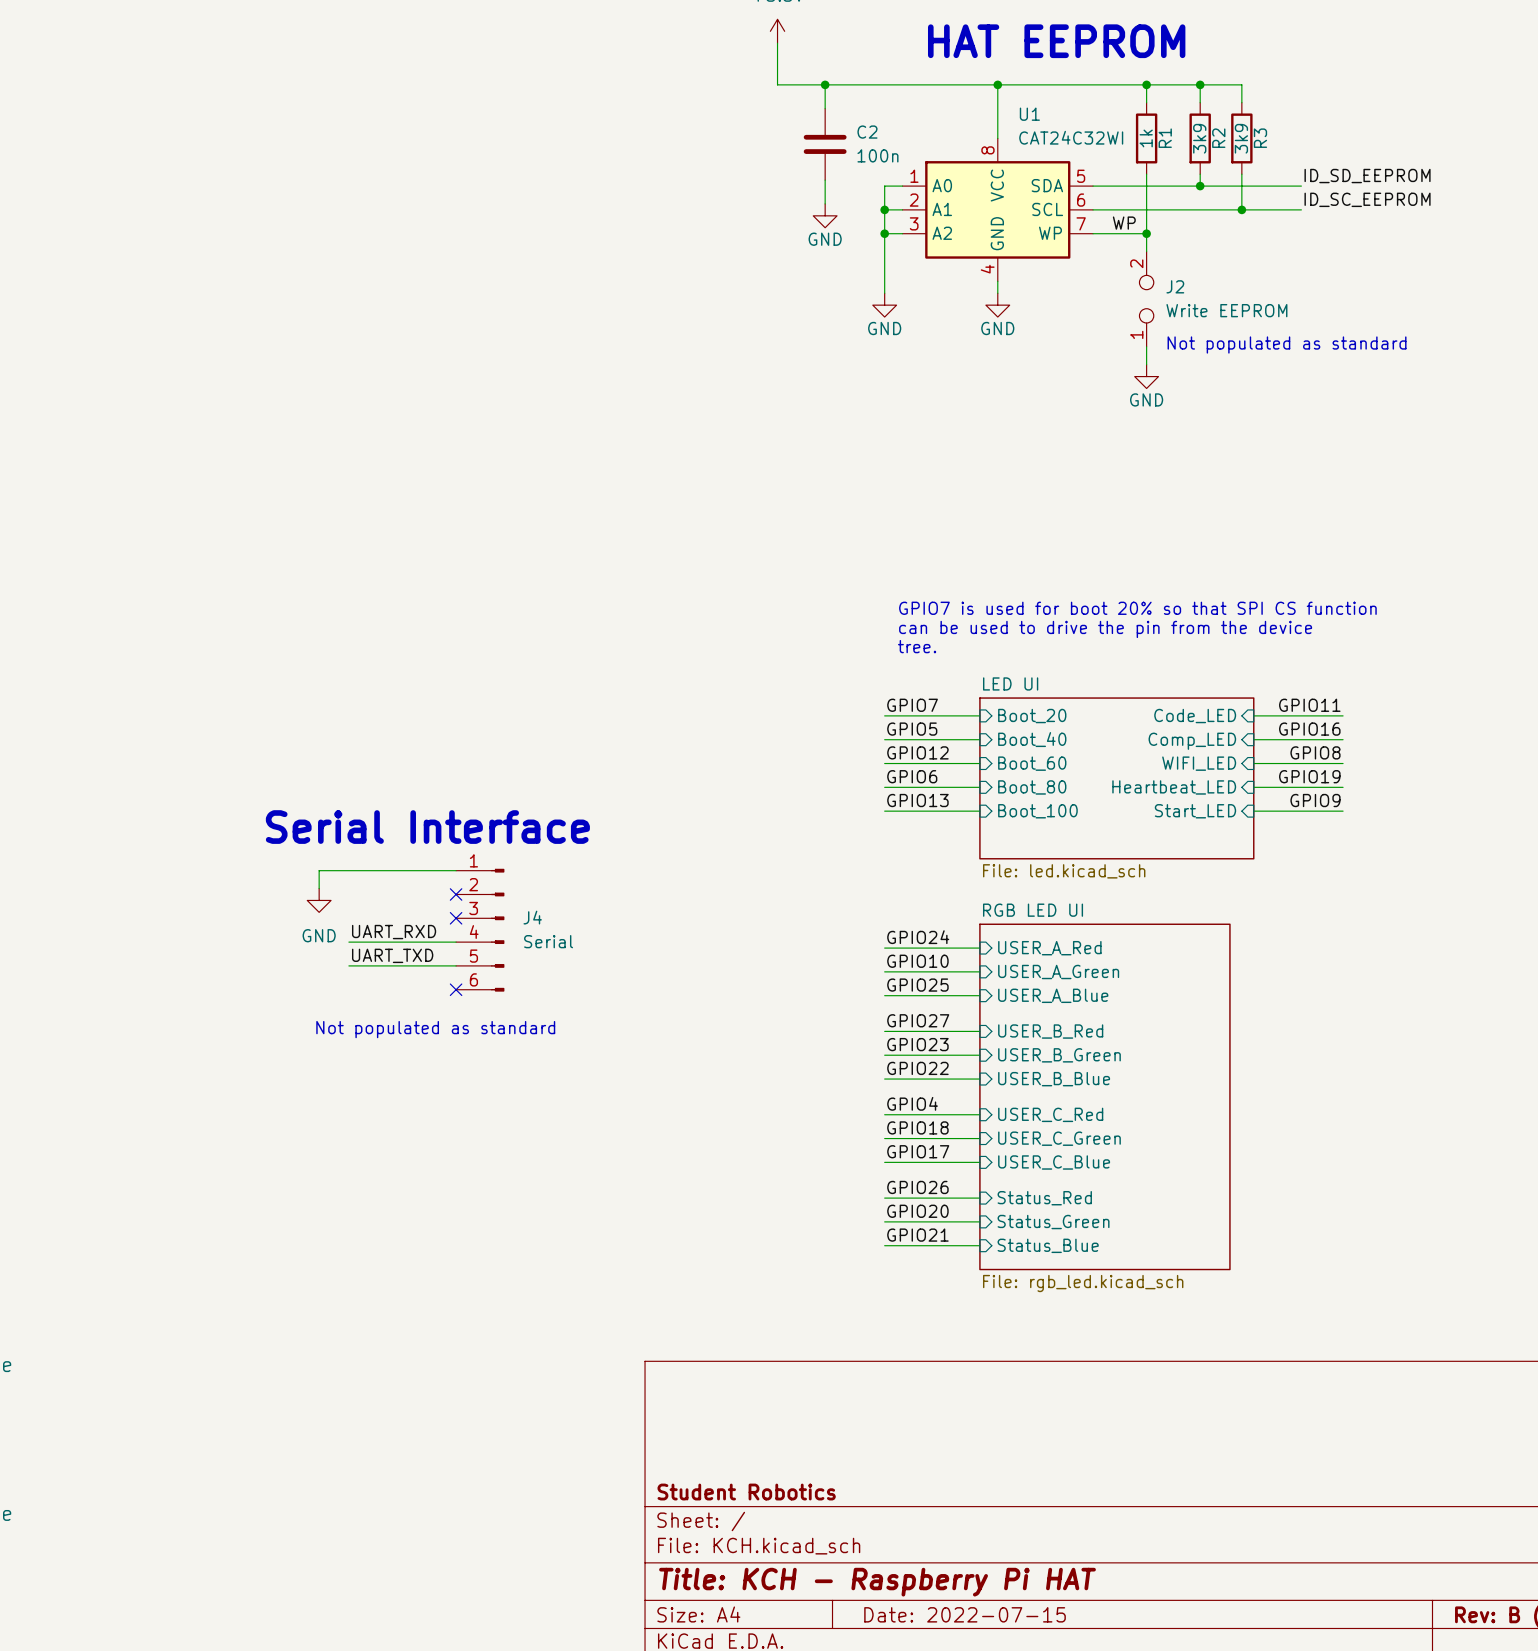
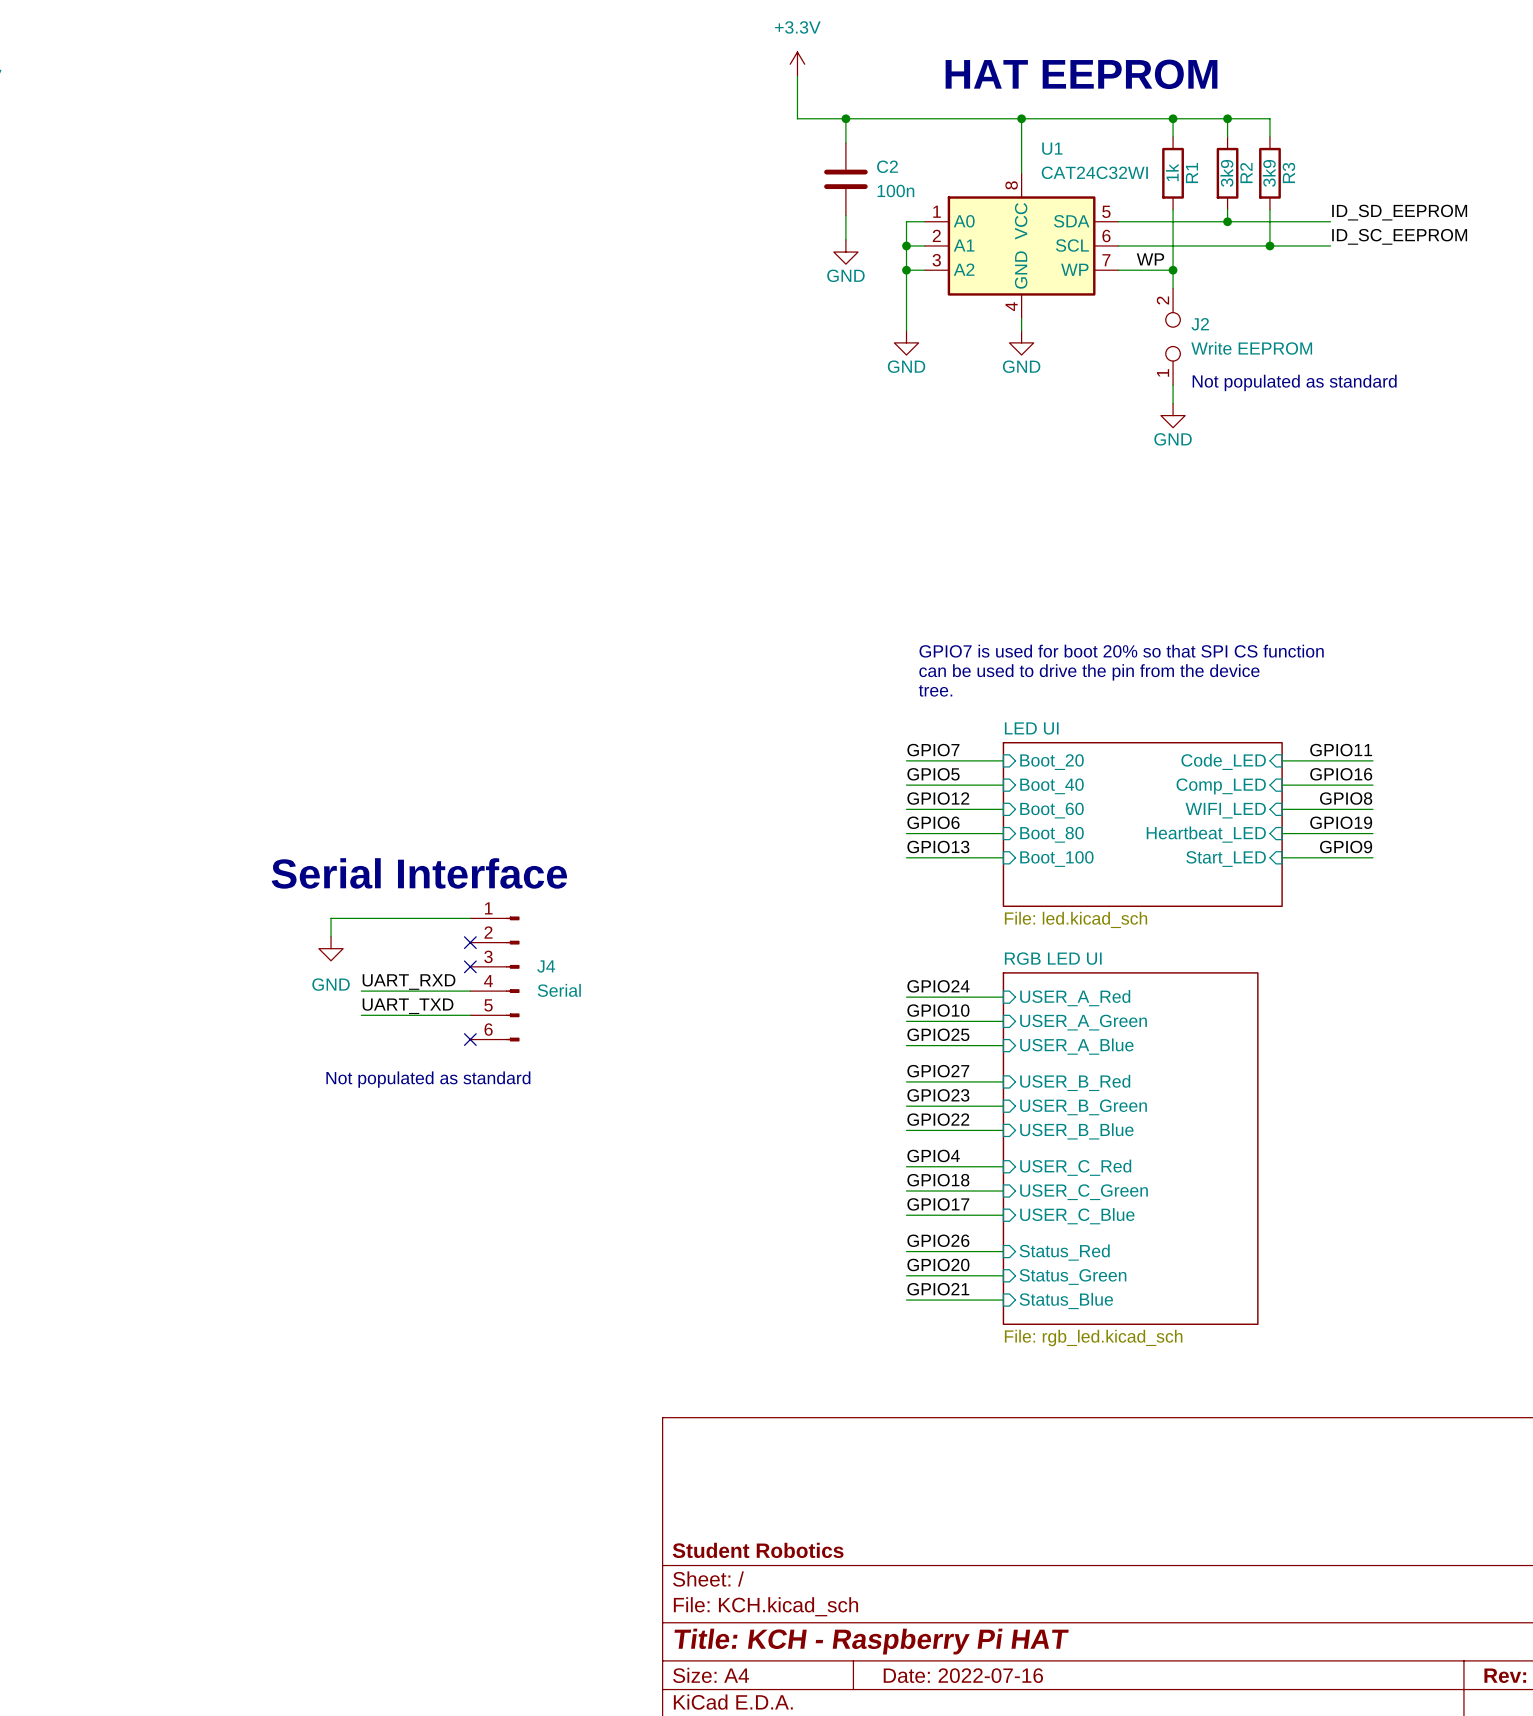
title block: Date: 2022-07-15 (965, 1614) -> Date: 2022-07-16 (963, 1675)

